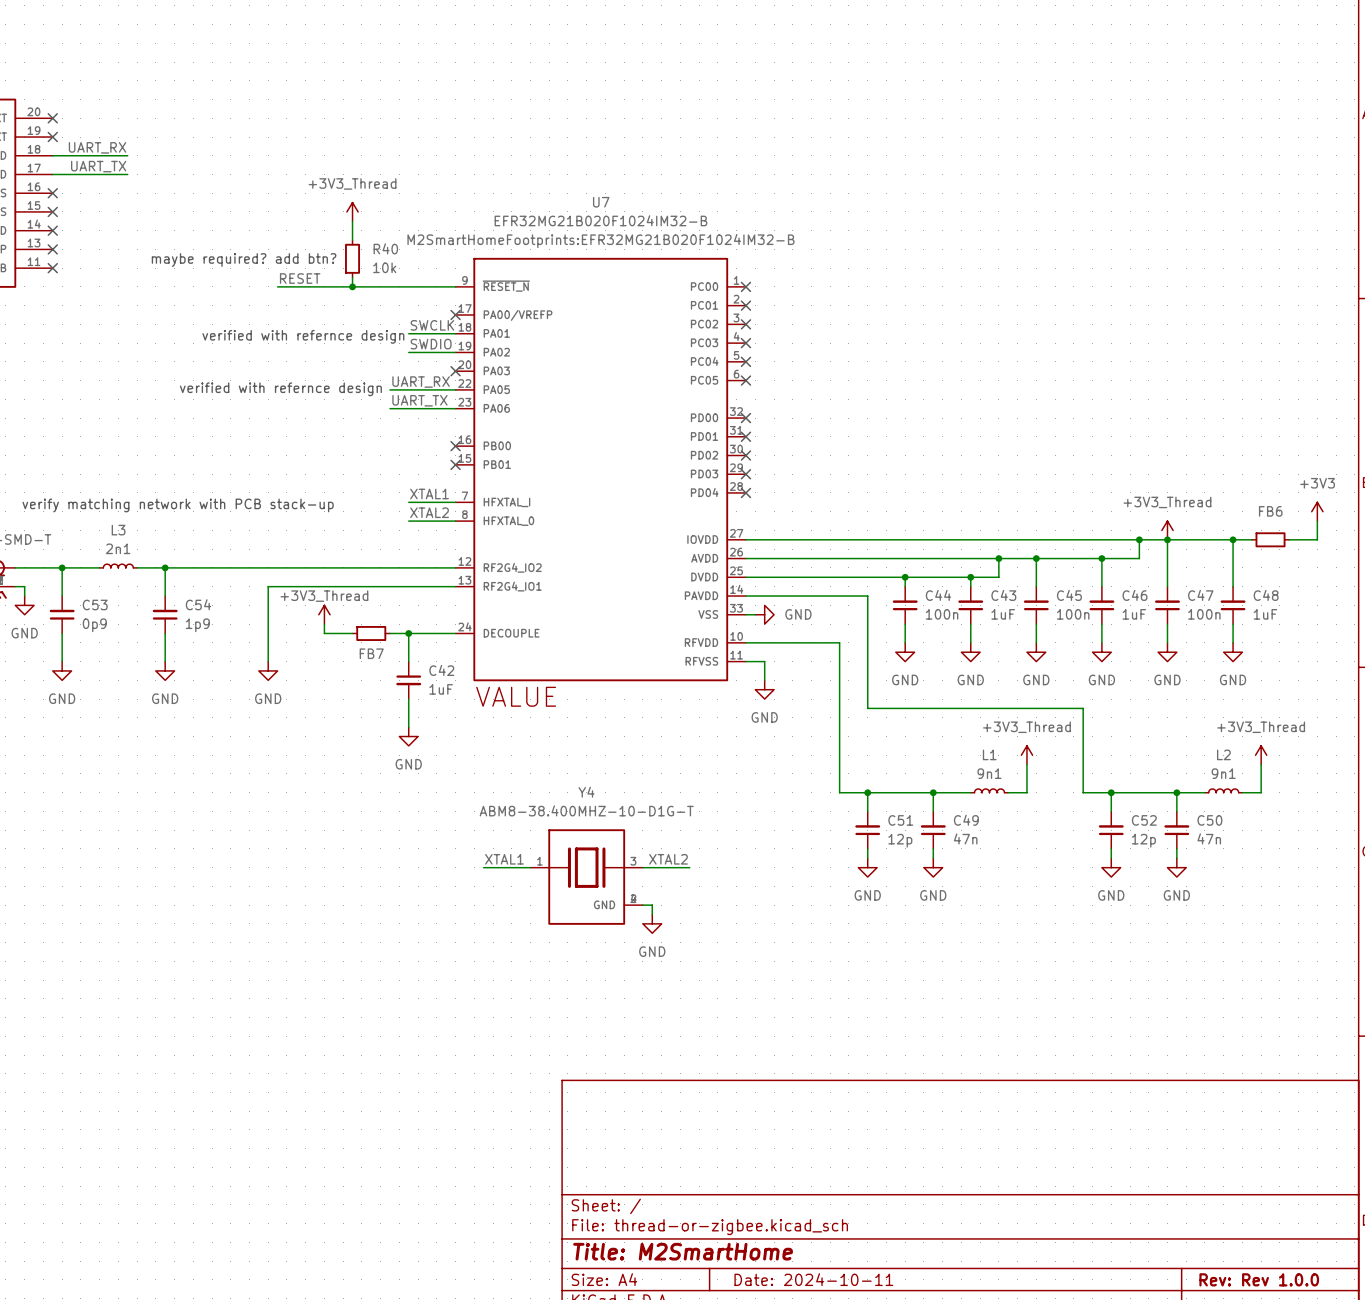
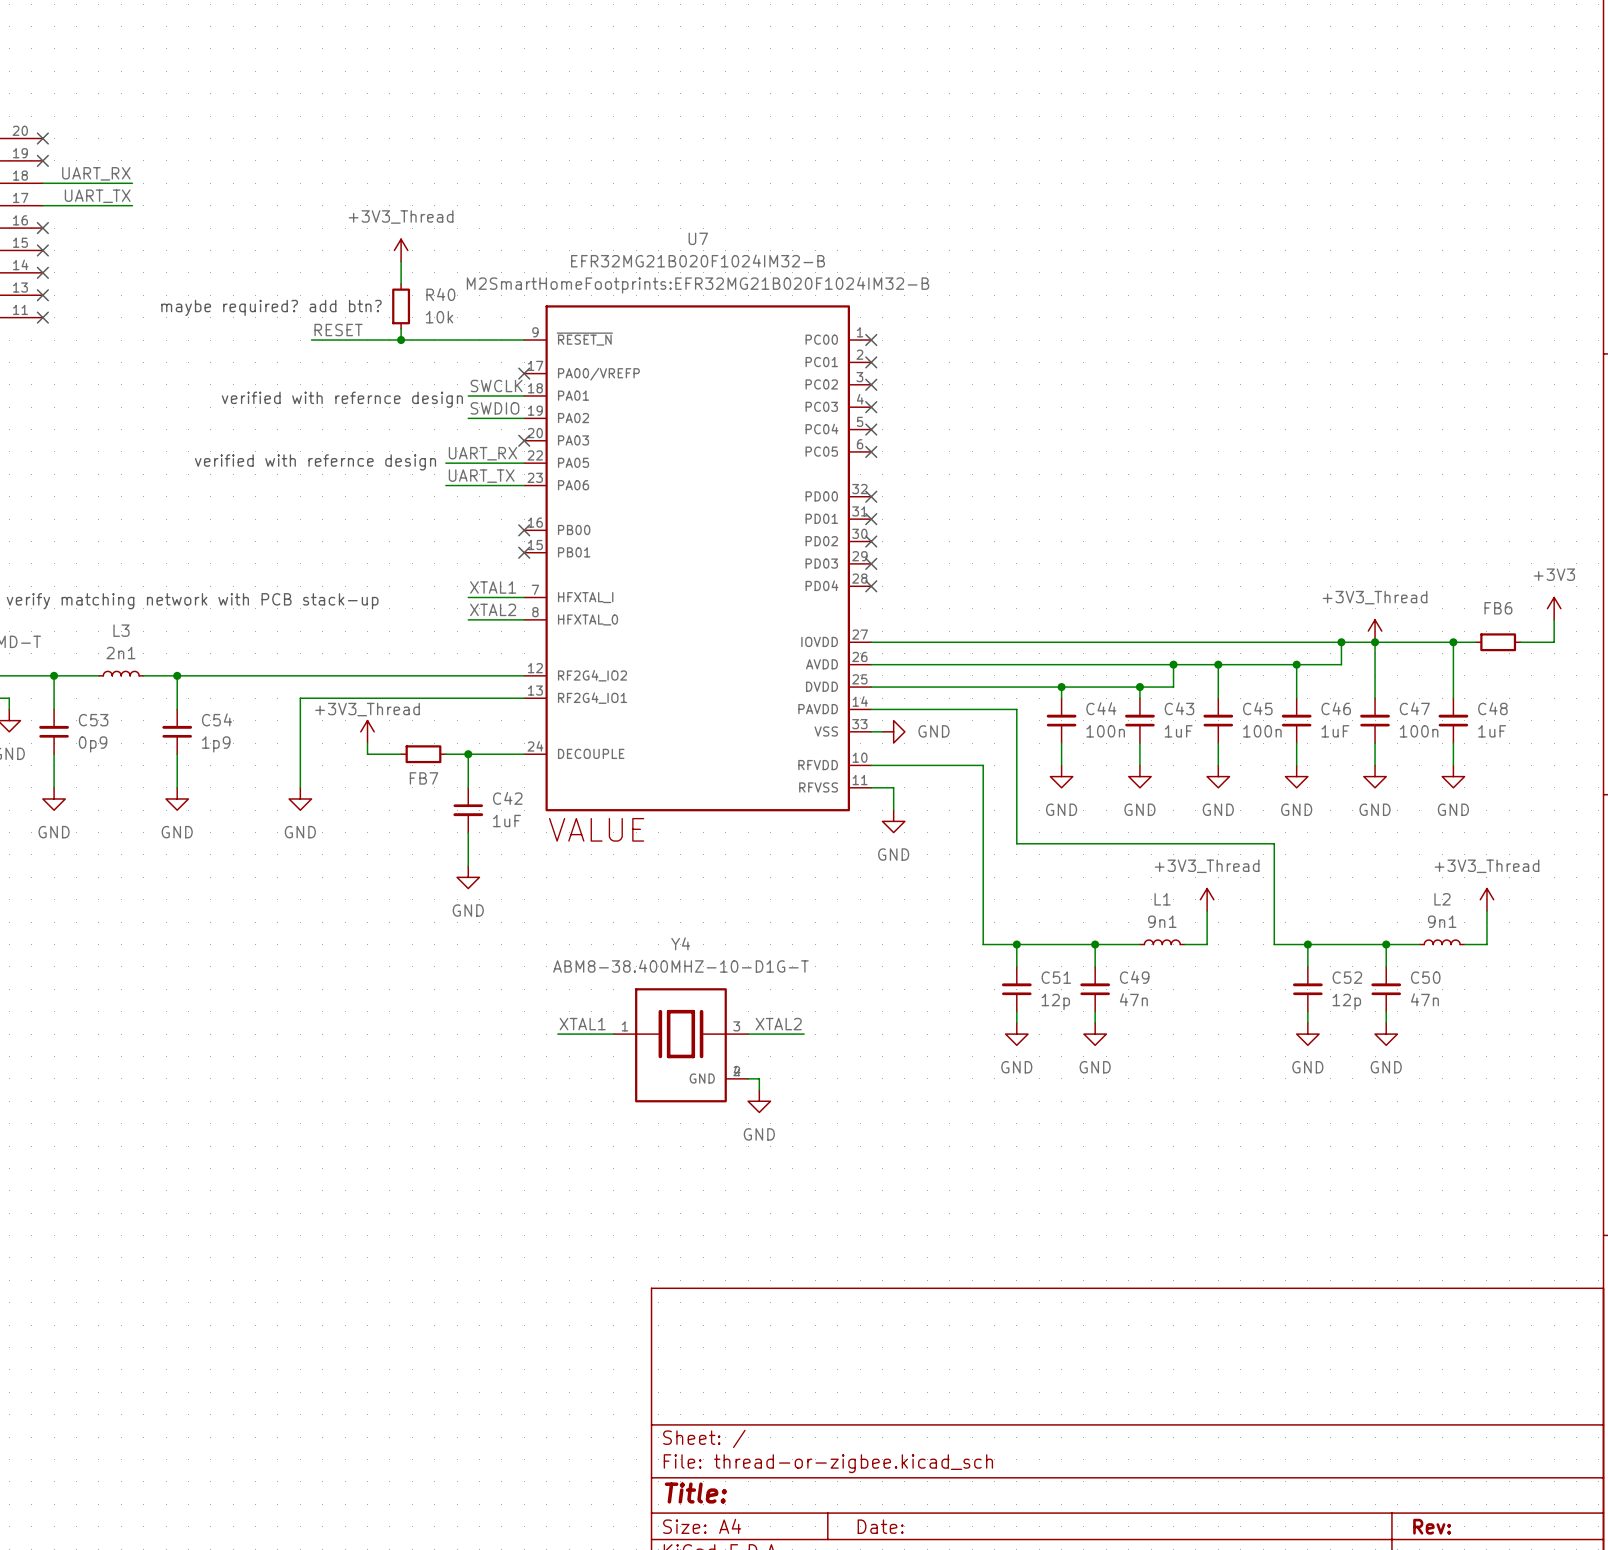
title block: Title: M2SmartHome (683, 1251) -> Title: (695, 1493)
title block: Date: 2024-10-11 (813, 1279) -> Date: (880, 1526)
title block: Rev: Rev 1.0.0 (1259, 1279) -> Rev: (1432, 1526)

